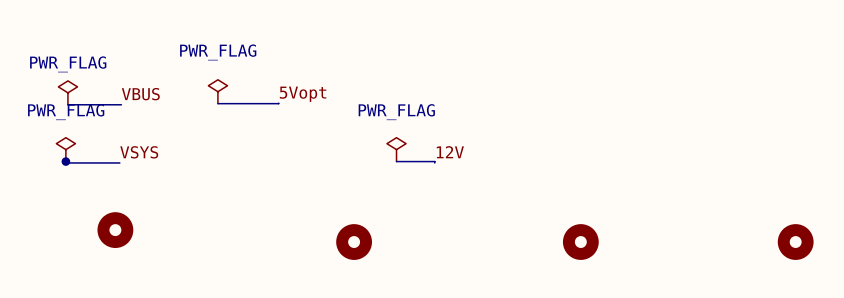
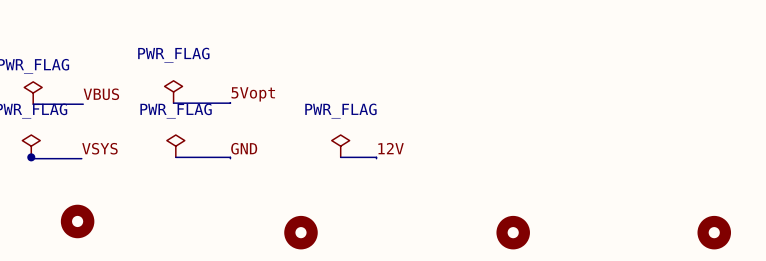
power symbol: none -> PWR_FLAG (175, 146)
label: none -> GND (244, 148)
wire: none -> (175, 157) (230, 158)

